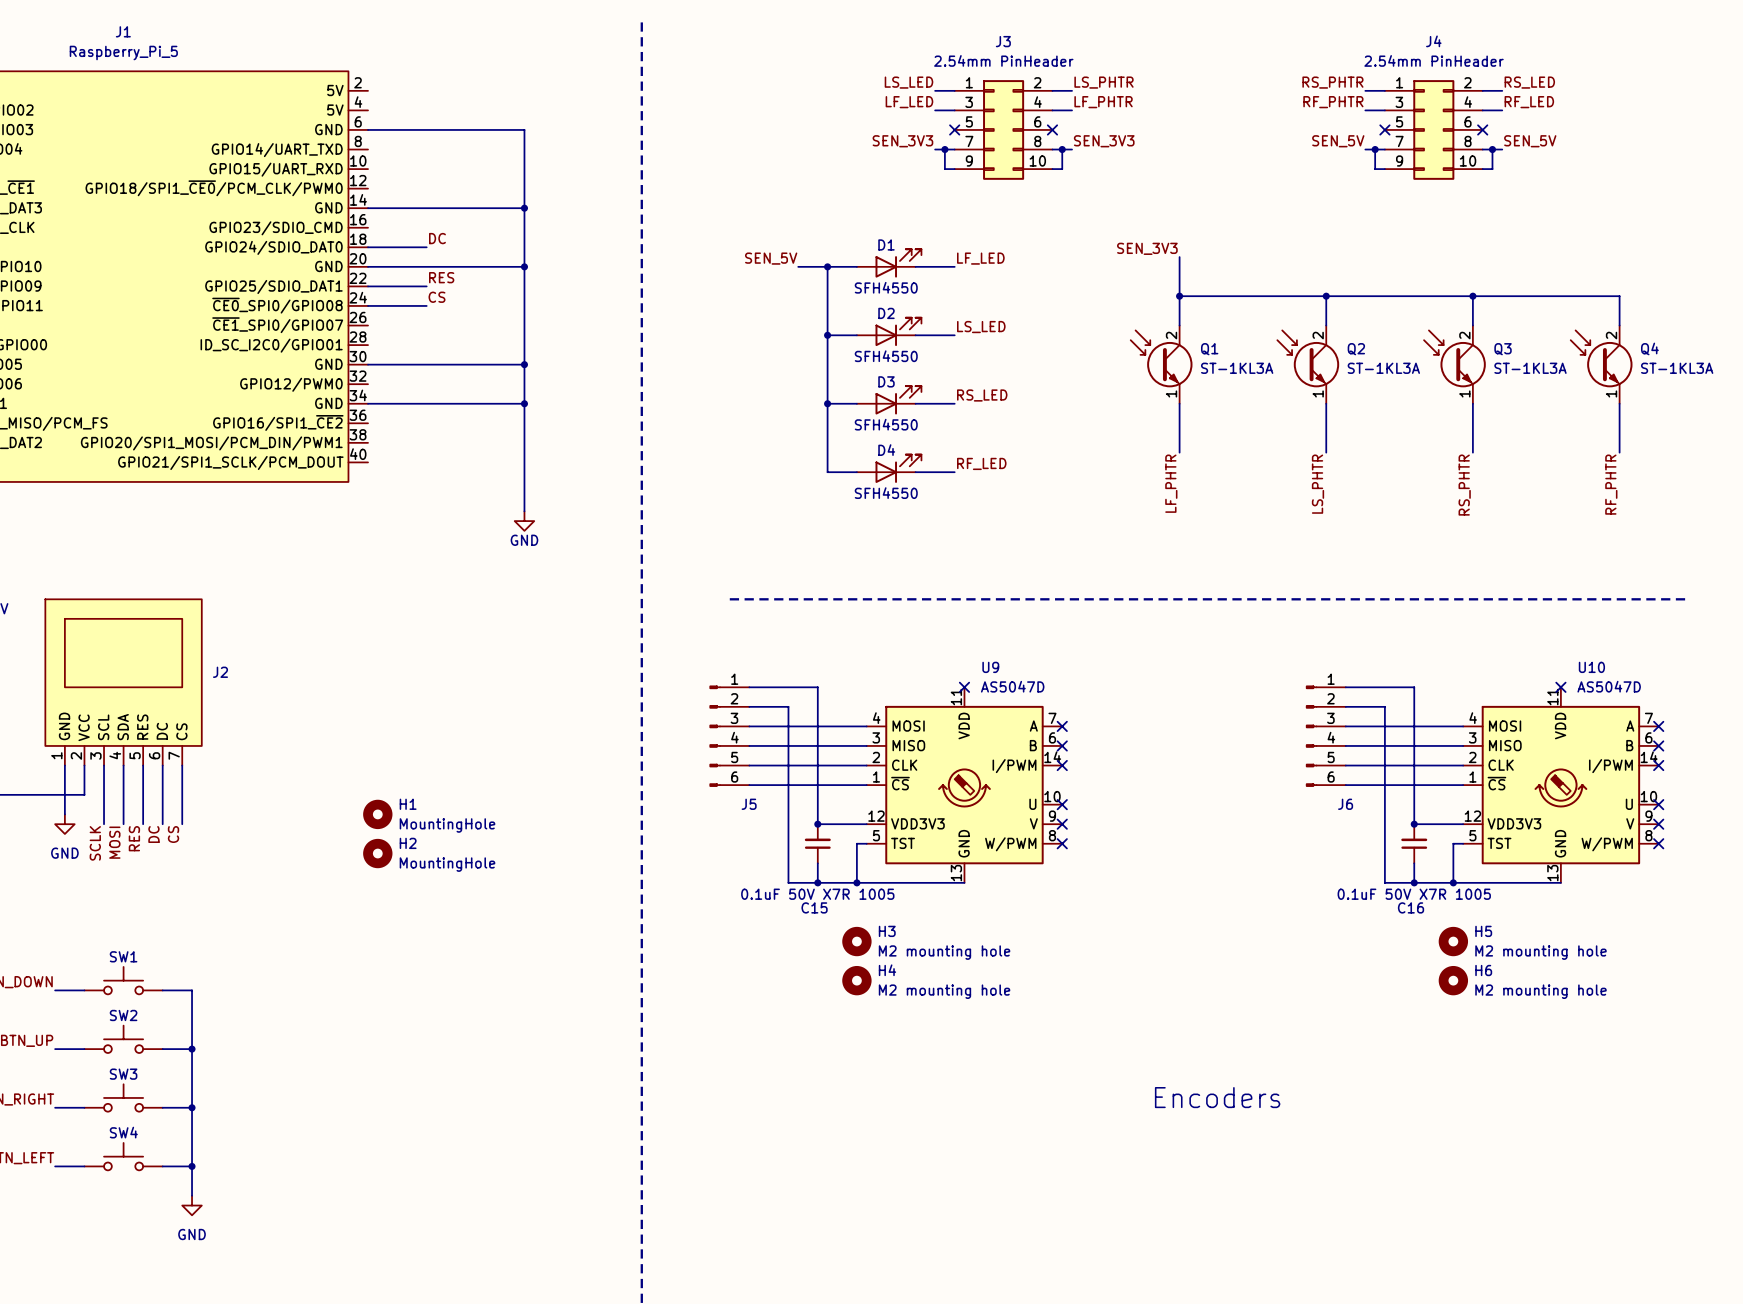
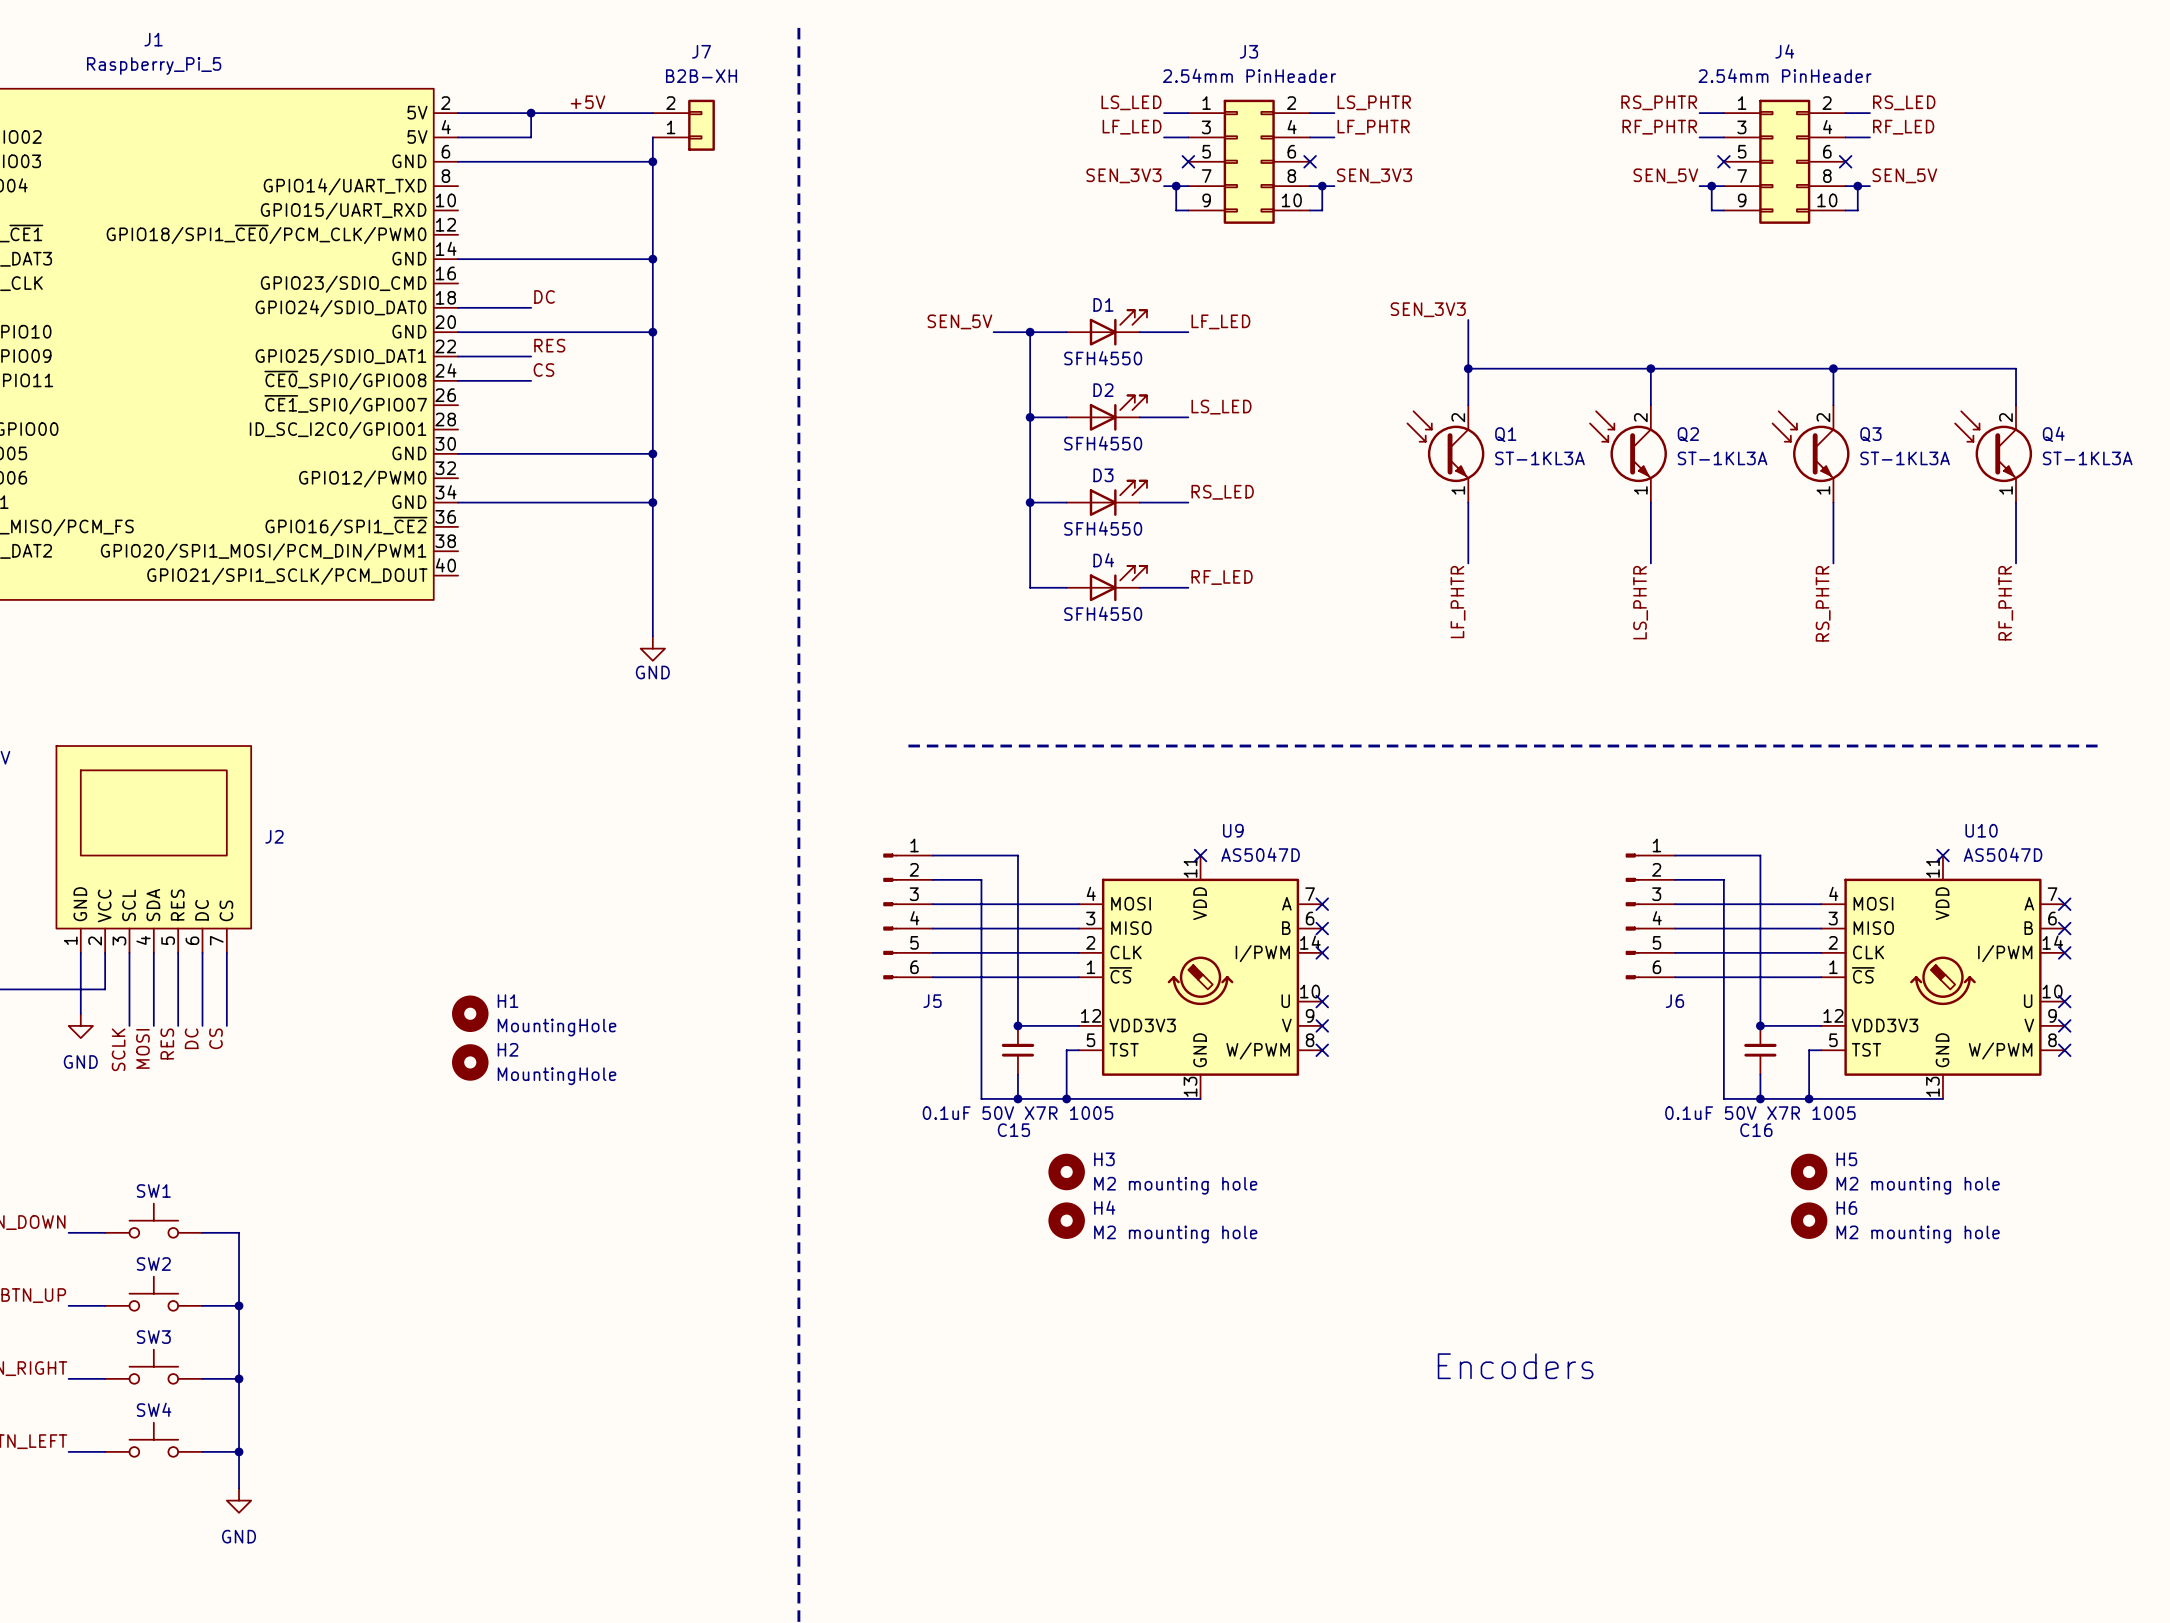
label: none -> +5V (588, 102)
wire: none -> (458, 113) (652, 113)
wire: none -> (531, 113) (531, 137) (458, 137)
junction: none -> (531, 113)
J7: none -> B2B-XH (683, 125)
wire: none -> (652, 137) (652, 161)
junction: none -> (652, 161)

